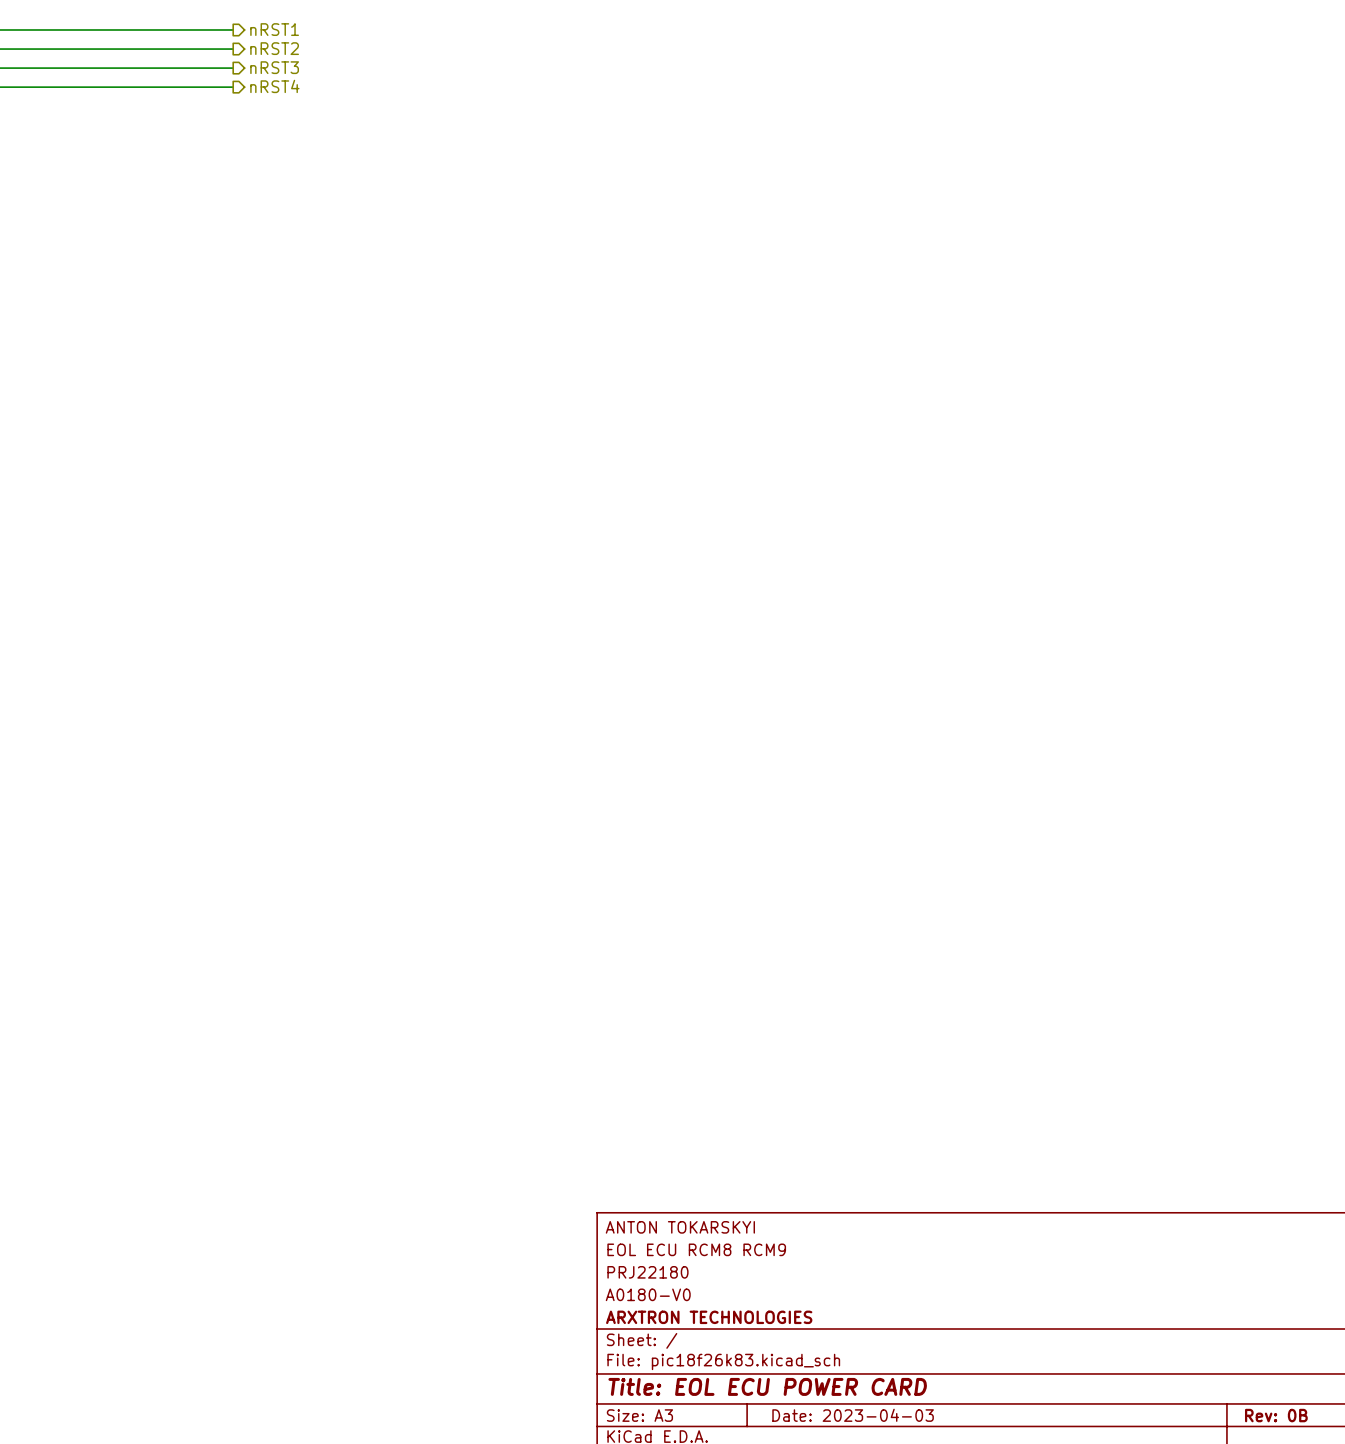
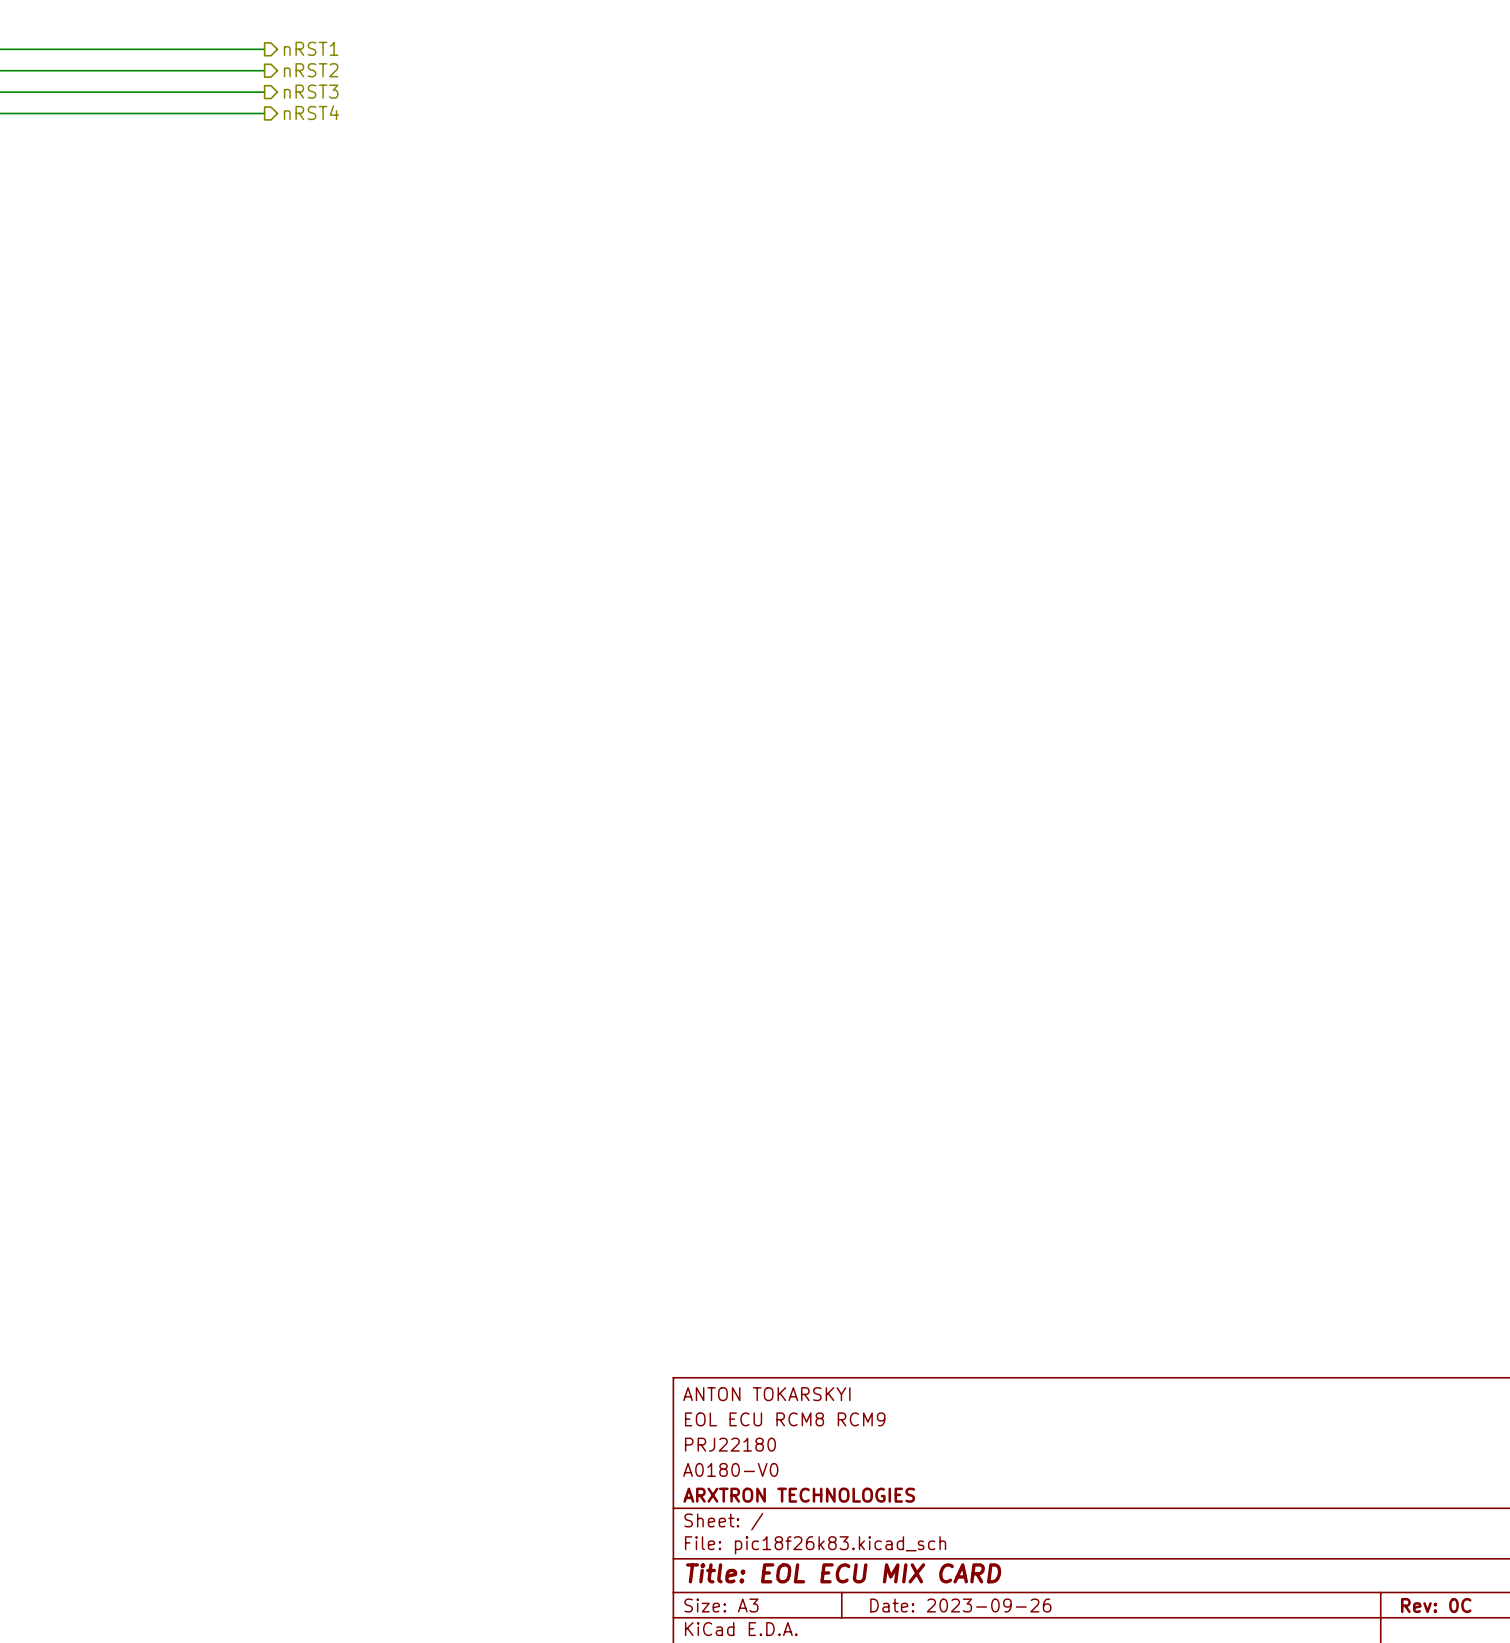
title block: Title: EOL ECU POWER CARD (767, 1386) -> Title: EOL ECU MIX CARD (843, 1573)
title block: Date: 2023-04-03 (853, 1415) -> Date: 2023-09-26 (960, 1605)
title block: Rev: 0B (1276, 1415) -> Rev: 0C (1436, 1605)

